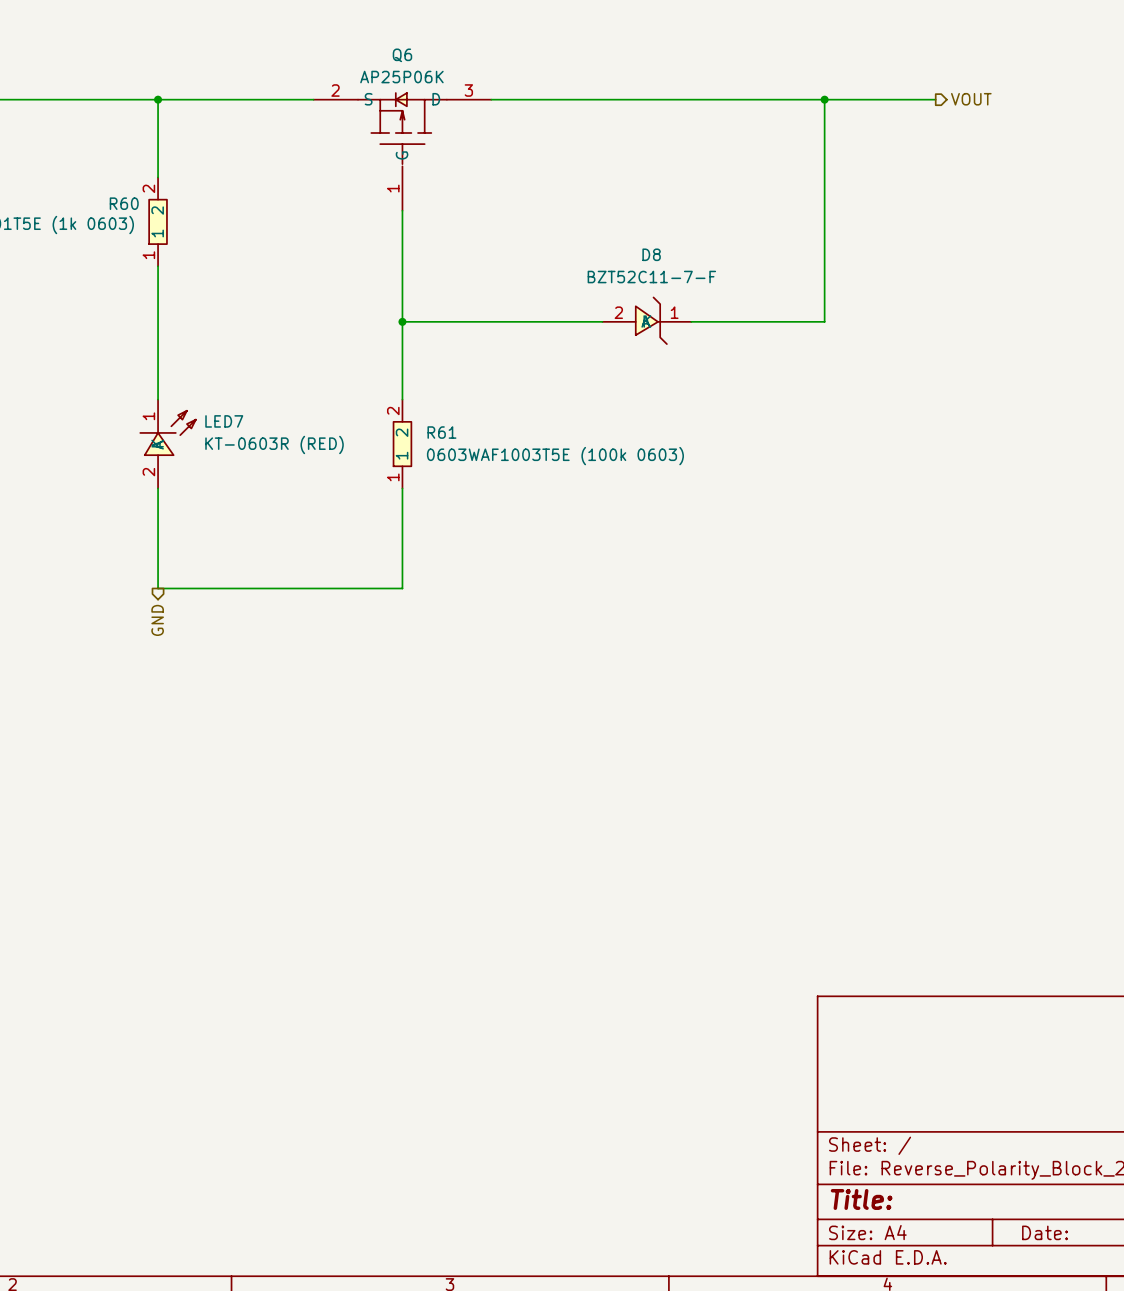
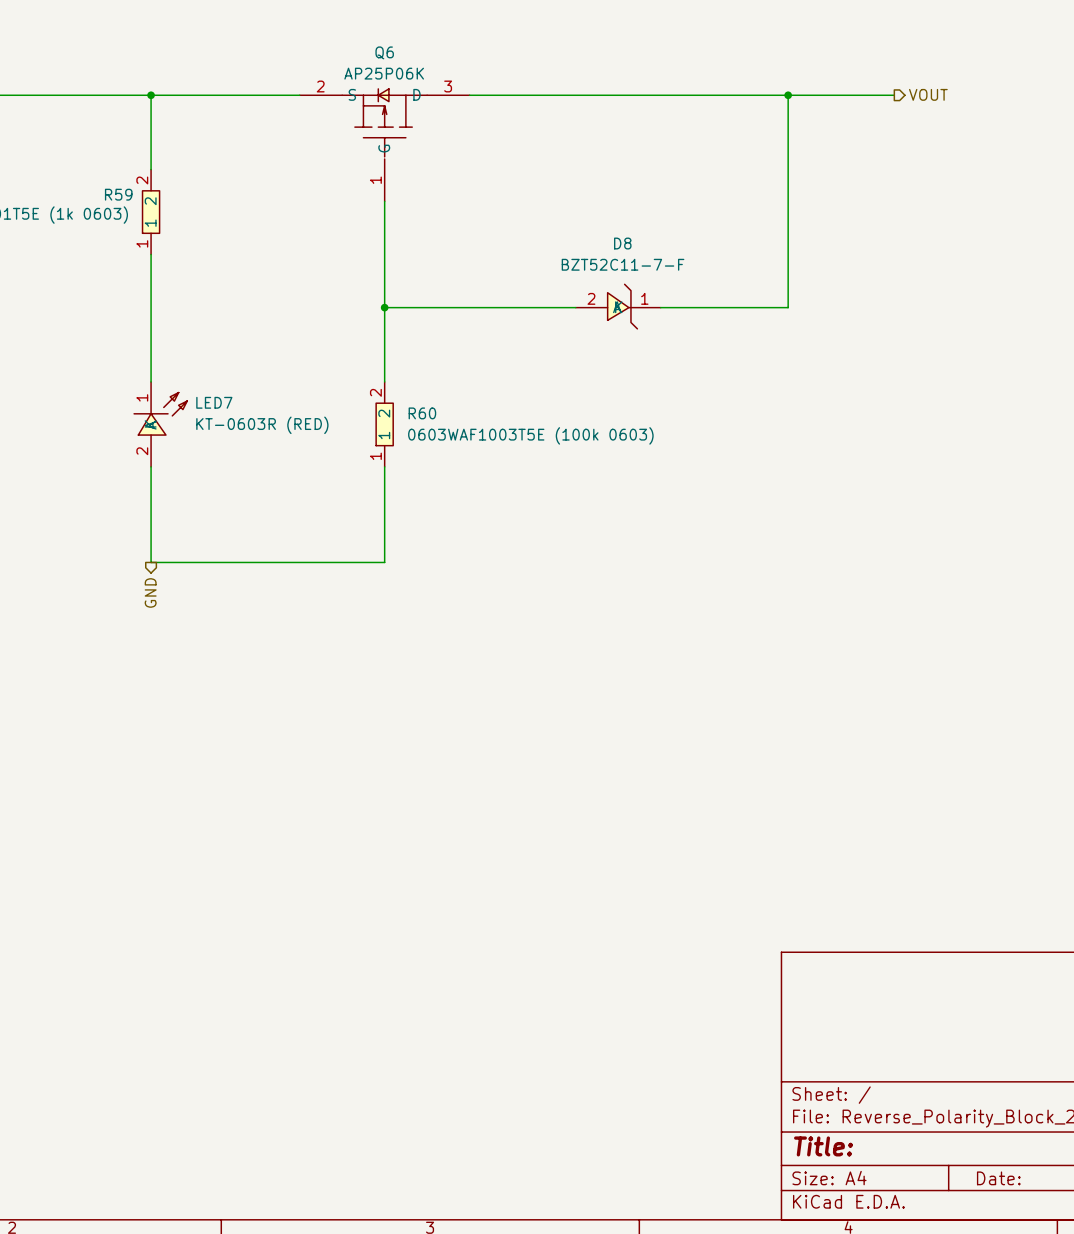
R60 name: R60 (124, 203) -> R59 (118, 194)
R61 name: R61 (441, 432) -> R60 (422, 413)

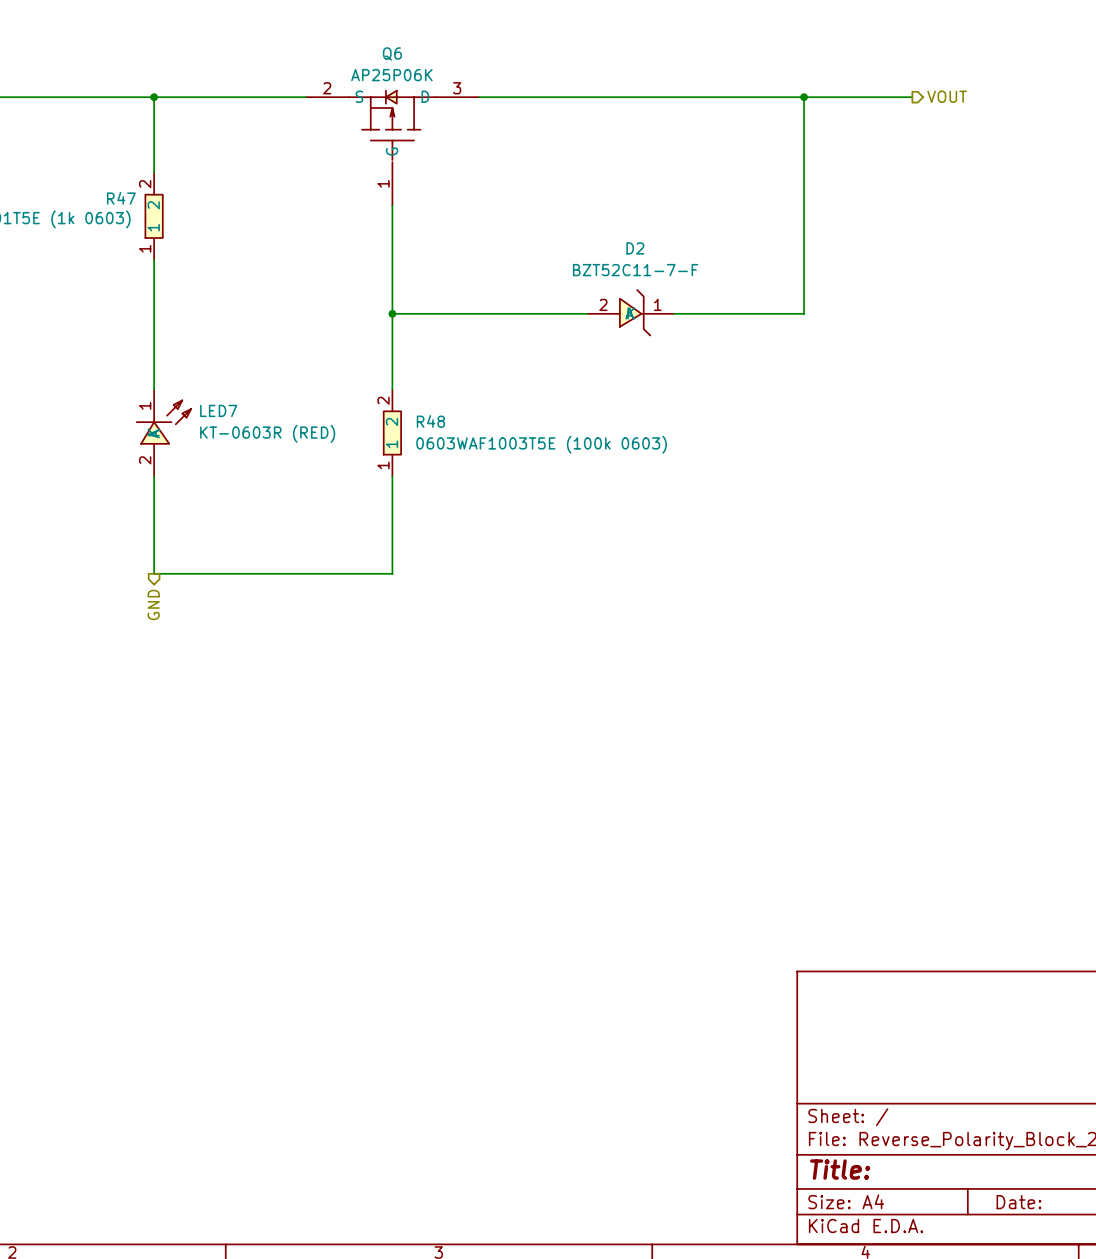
R59 name: R59 (118, 194) -> R47 (121, 198)
D8 name: D8 (622, 243) -> D2 (635, 248)
R60 name: R60 (422, 413) -> R48 (430, 421)

